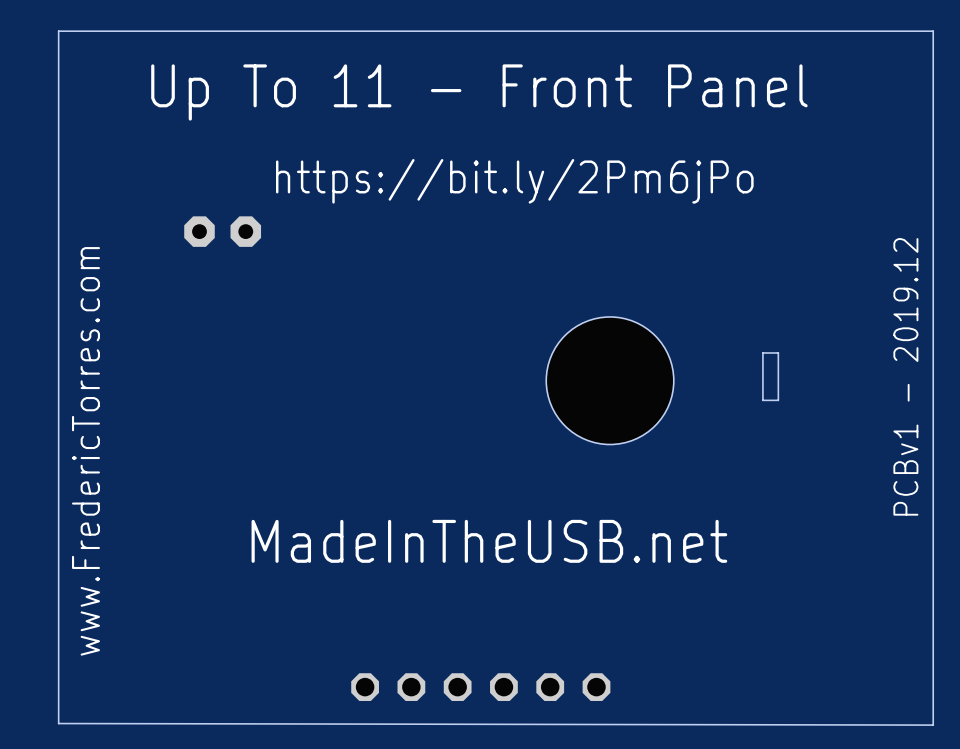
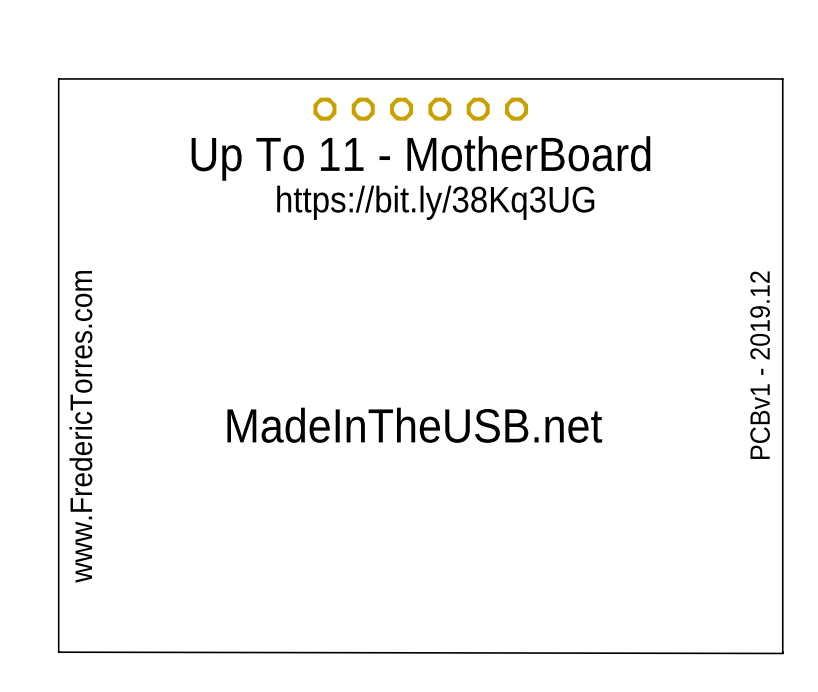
part: none -> (420, 109)
text: Up To 11 - Front Panel (479, 92) -> Up To 11 - MotherBoard (421, 158)
text: https://bit.ly/2Pm6jPo (514, 181) -> https://bit.ly/38Kq3UG (435, 202)
part: (222, 231) -> none
board edge: (778, 352) (762, 352) (762, 400) (778, 400) (778, 352) -> none
hole: (610, 380) -> none
text position: MadeInTheUSB.net (489, 541) -> MadeInTheUSB.net (414, 425)
part: (480, 687) -> none

